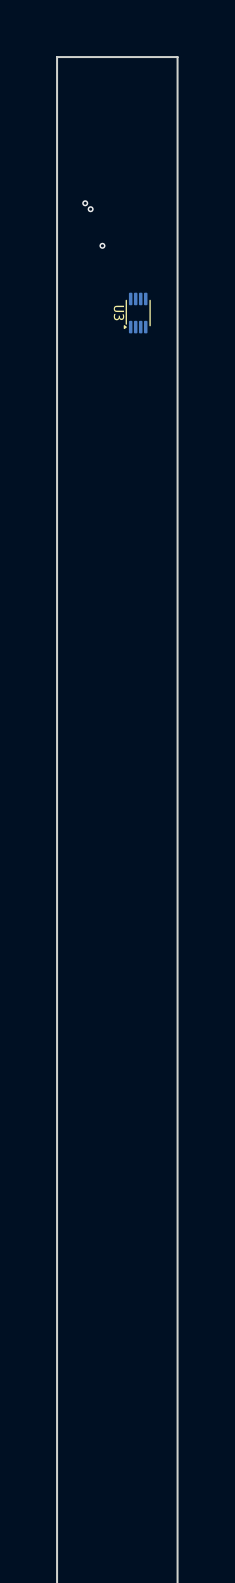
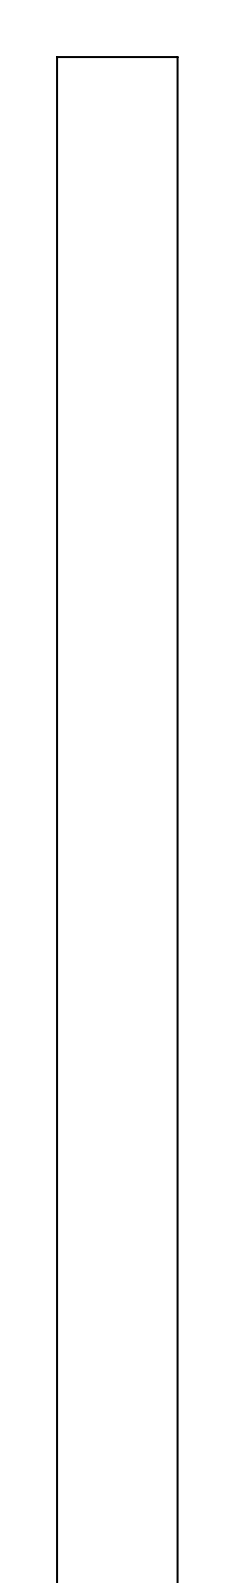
via: (85, 203) -> none
via: (90, 209) -> none
via: (102, 245) -> none
U3: (137, 313) -> none

